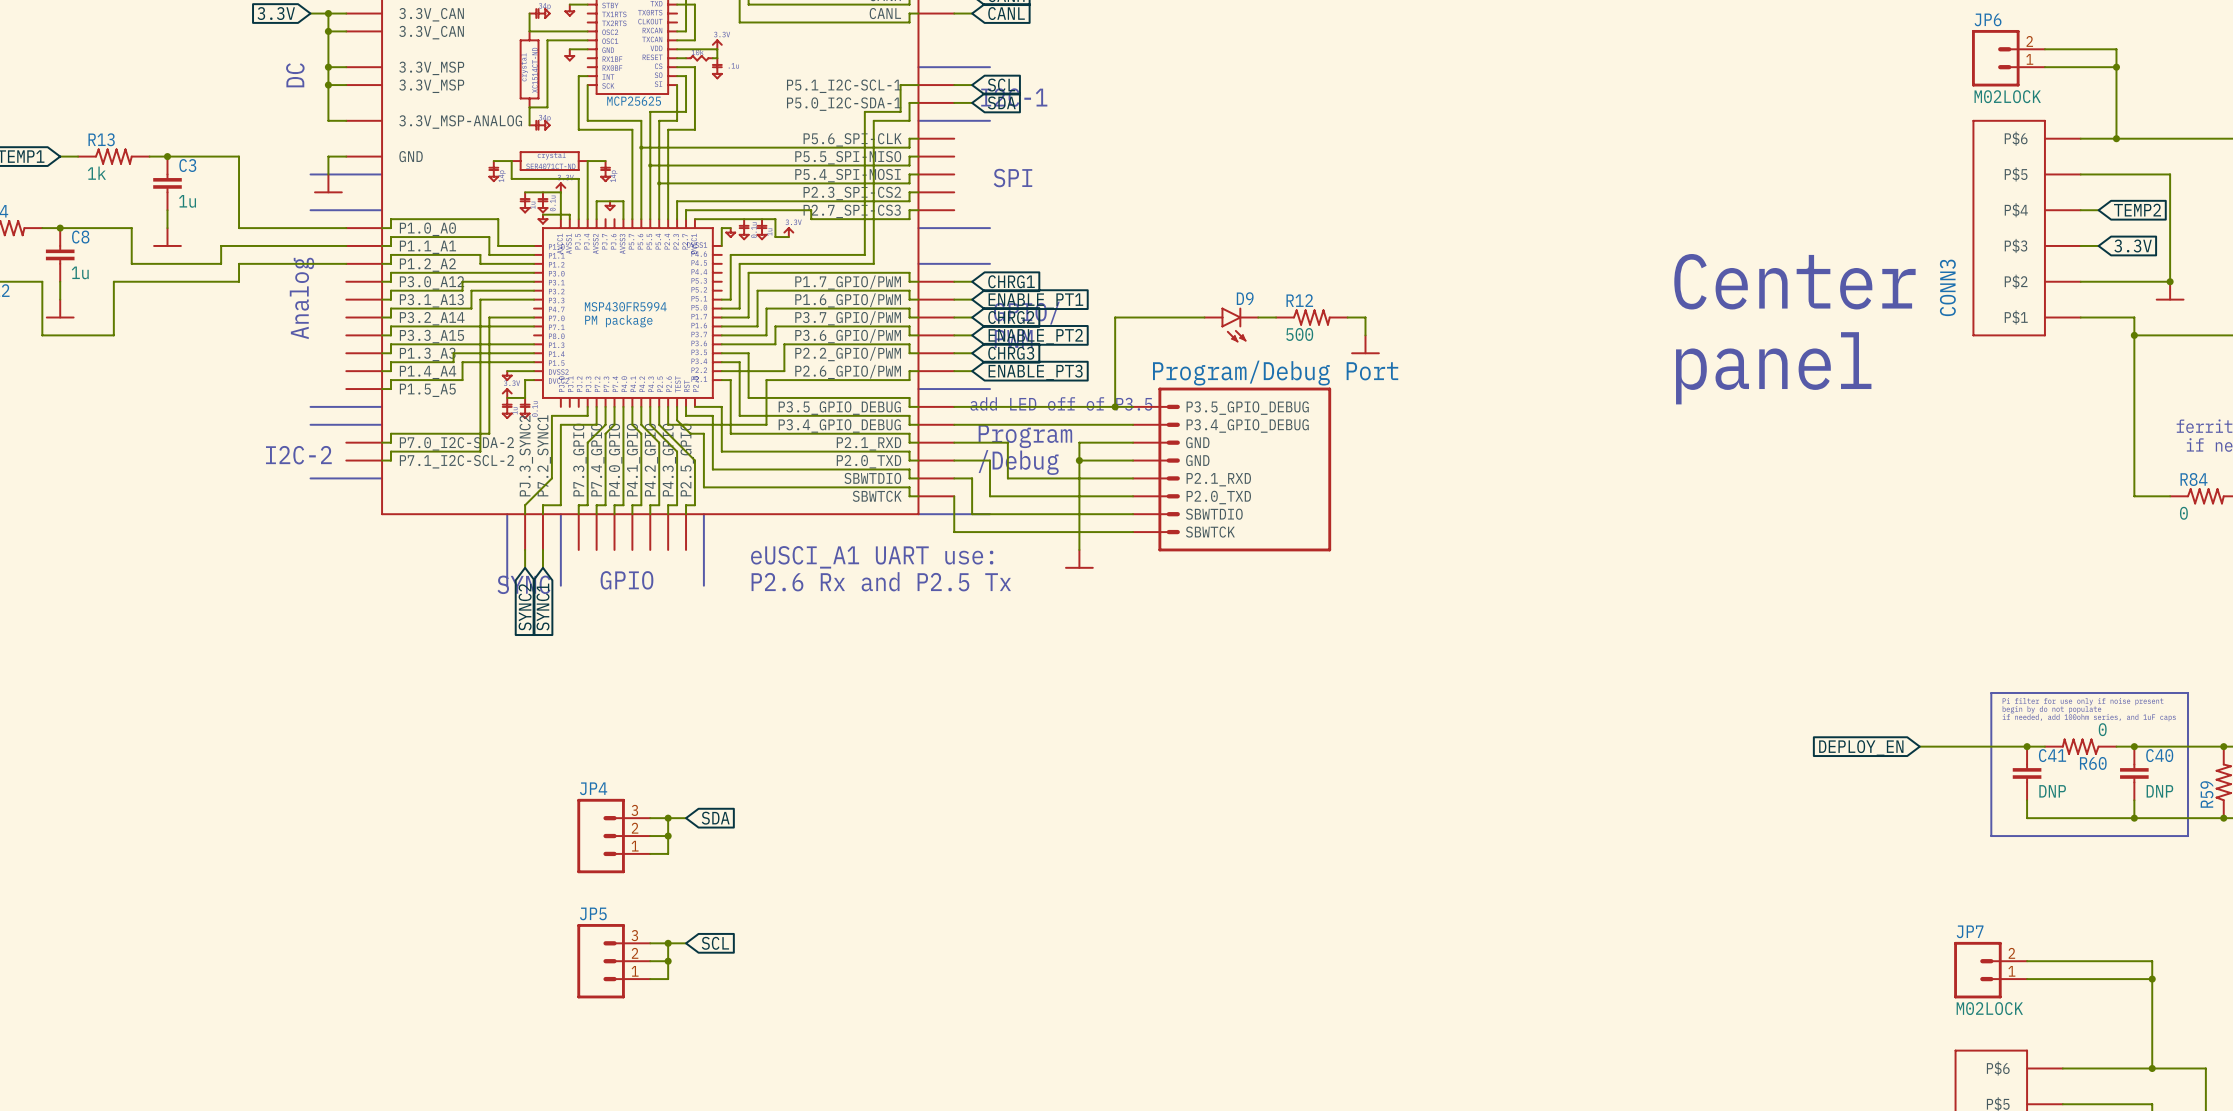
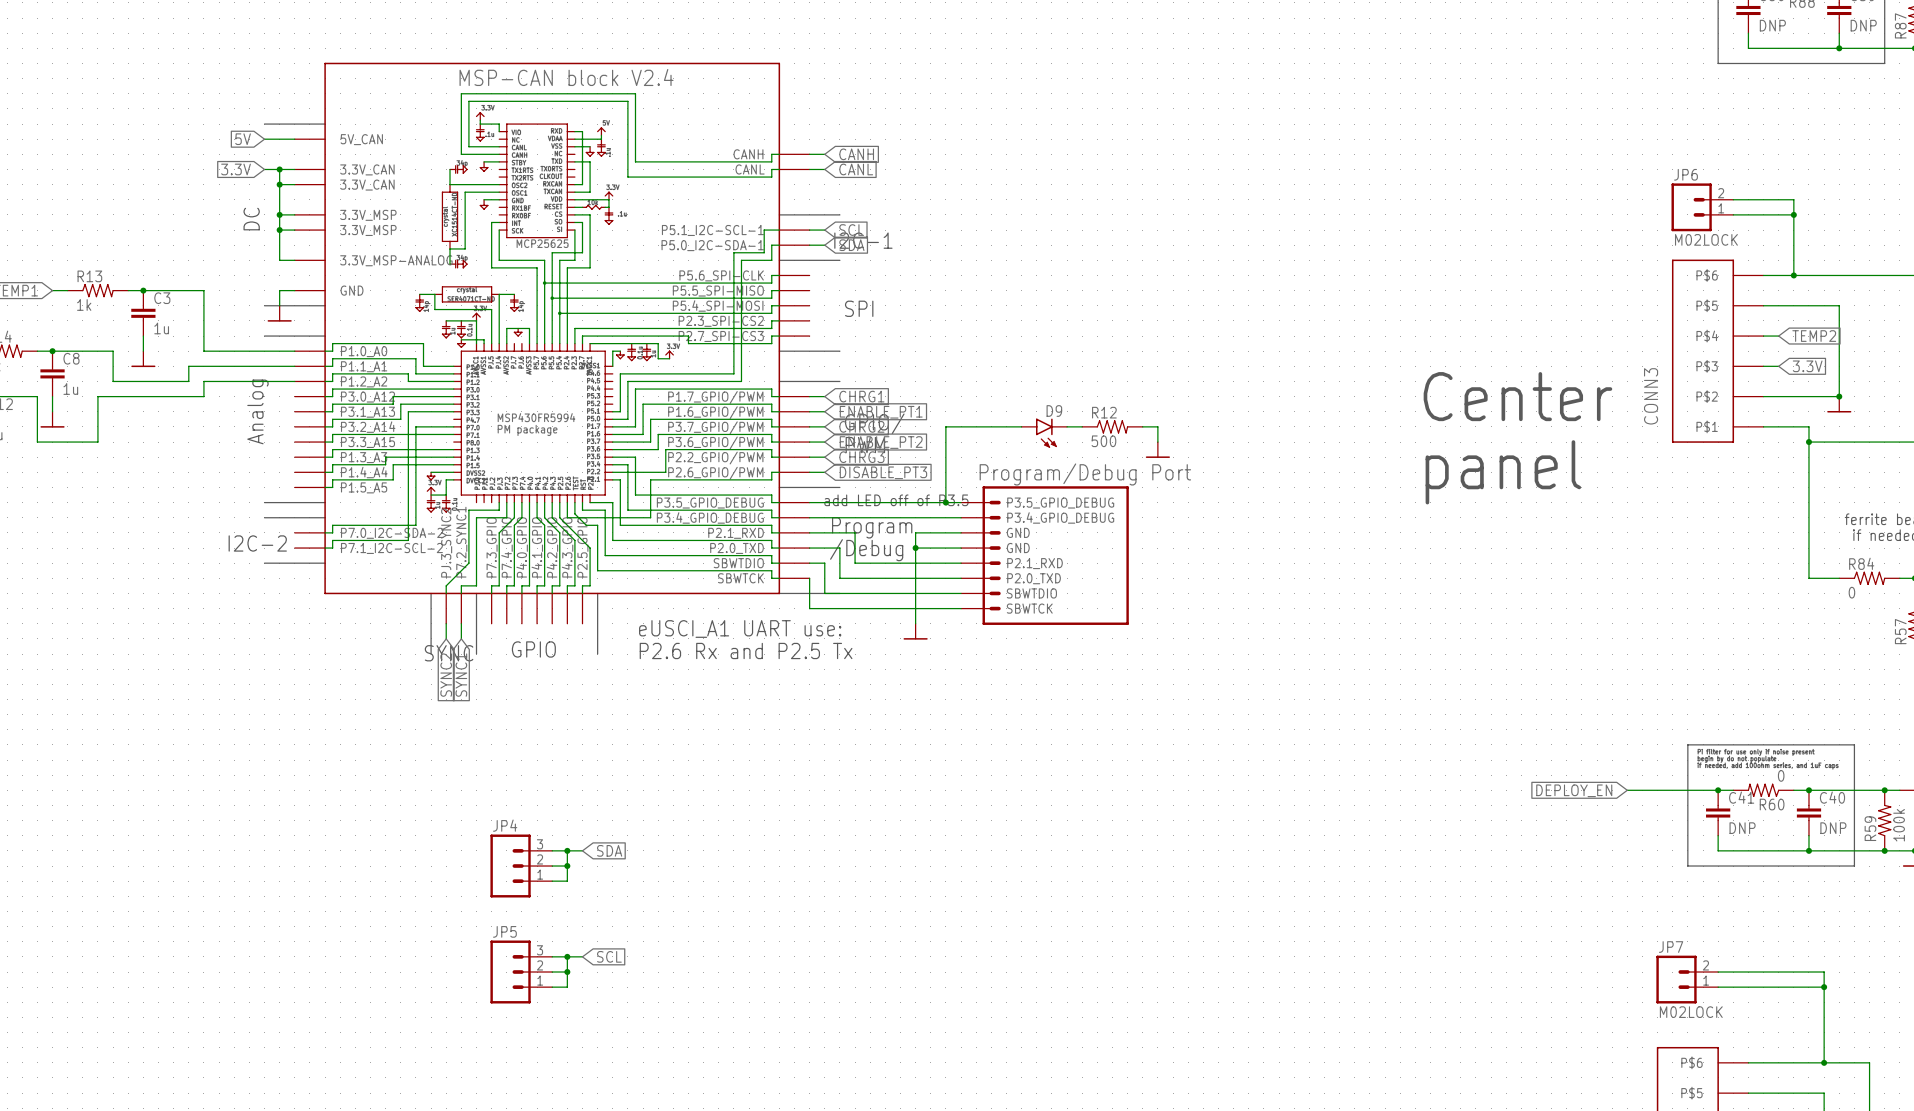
global label: ENABLE_PT3 (1035, 372) -> DISABLE_PT3 (883, 472)

